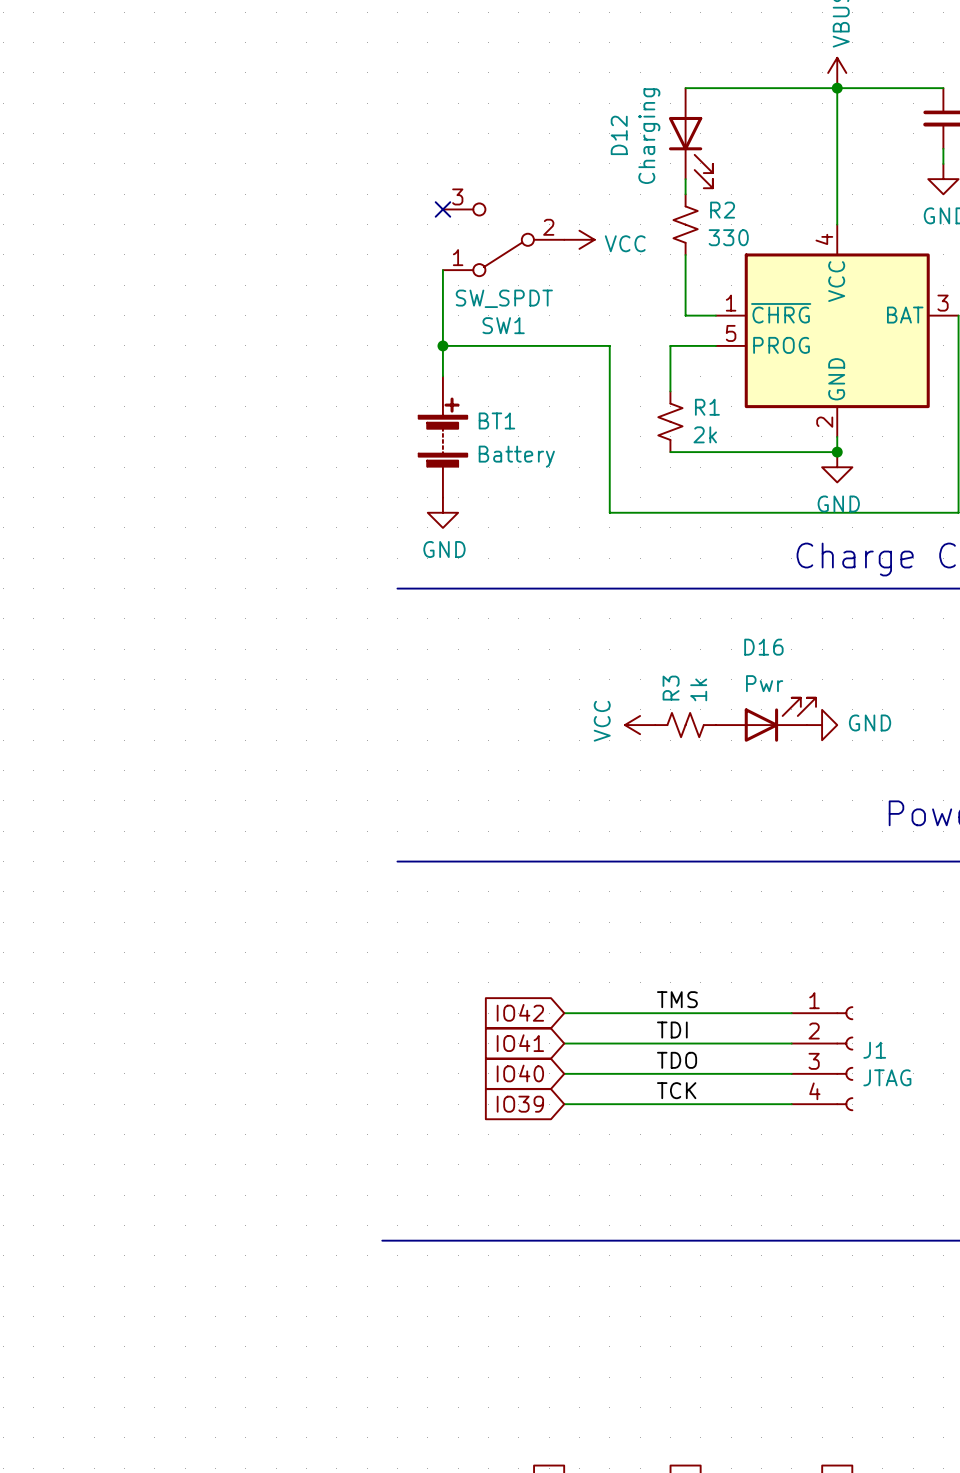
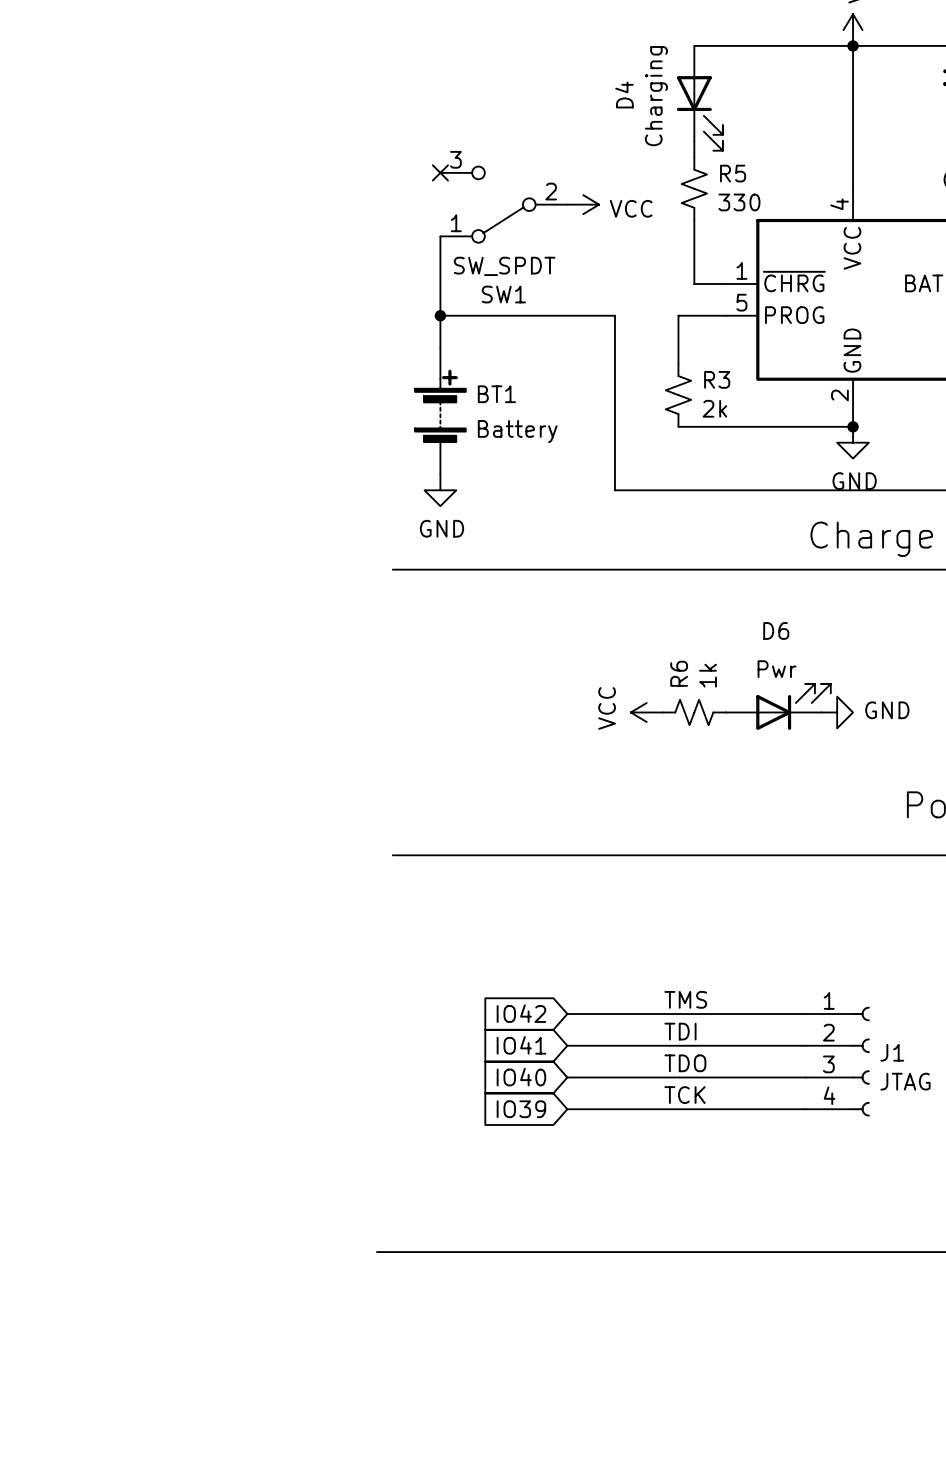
D12 name: D12 (619, 135) -> D4 (624, 95)
R2 name: R2 (722, 210) -> R5 (733, 173)
R1 name: R1 (707, 407) -> R3 (717, 379)
D16 name: D16 (763, 647) -> D6 (776, 630)
R3 name: R3 (671, 688) -> R6 (679, 673)

